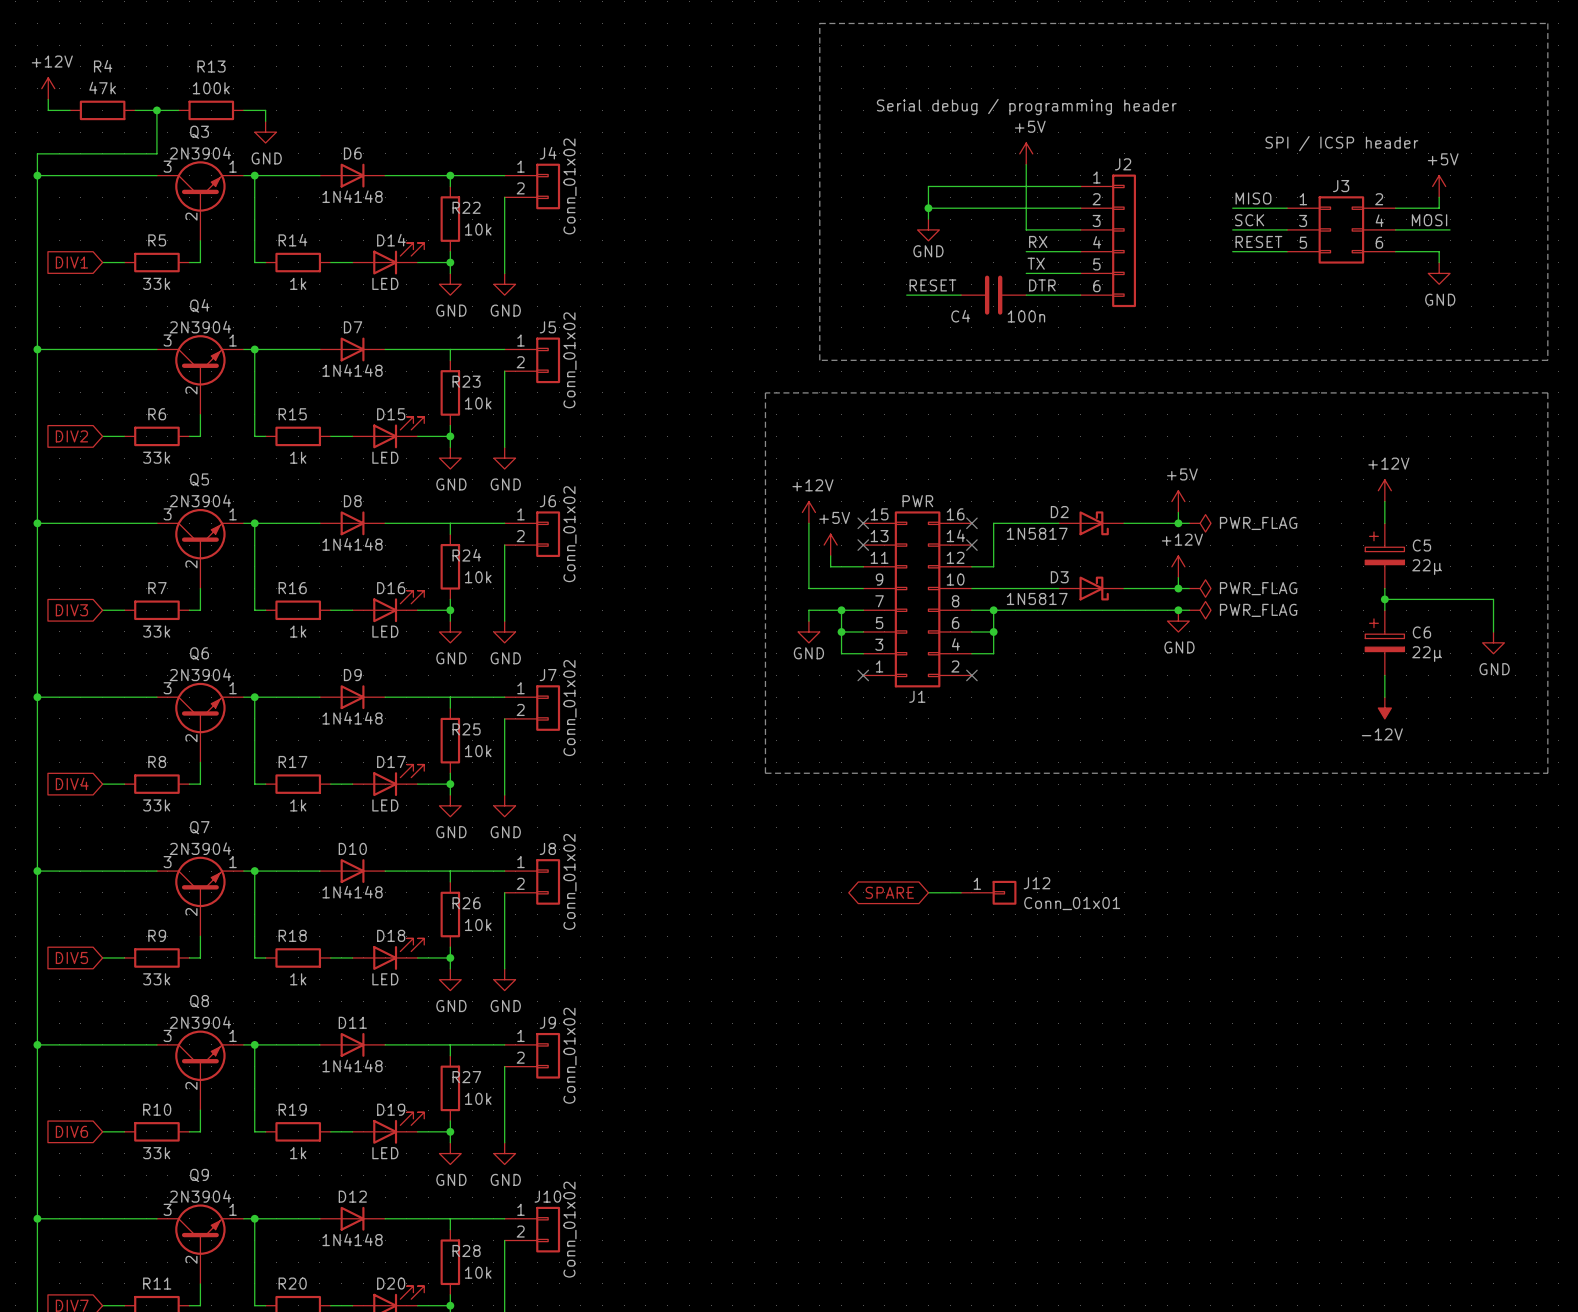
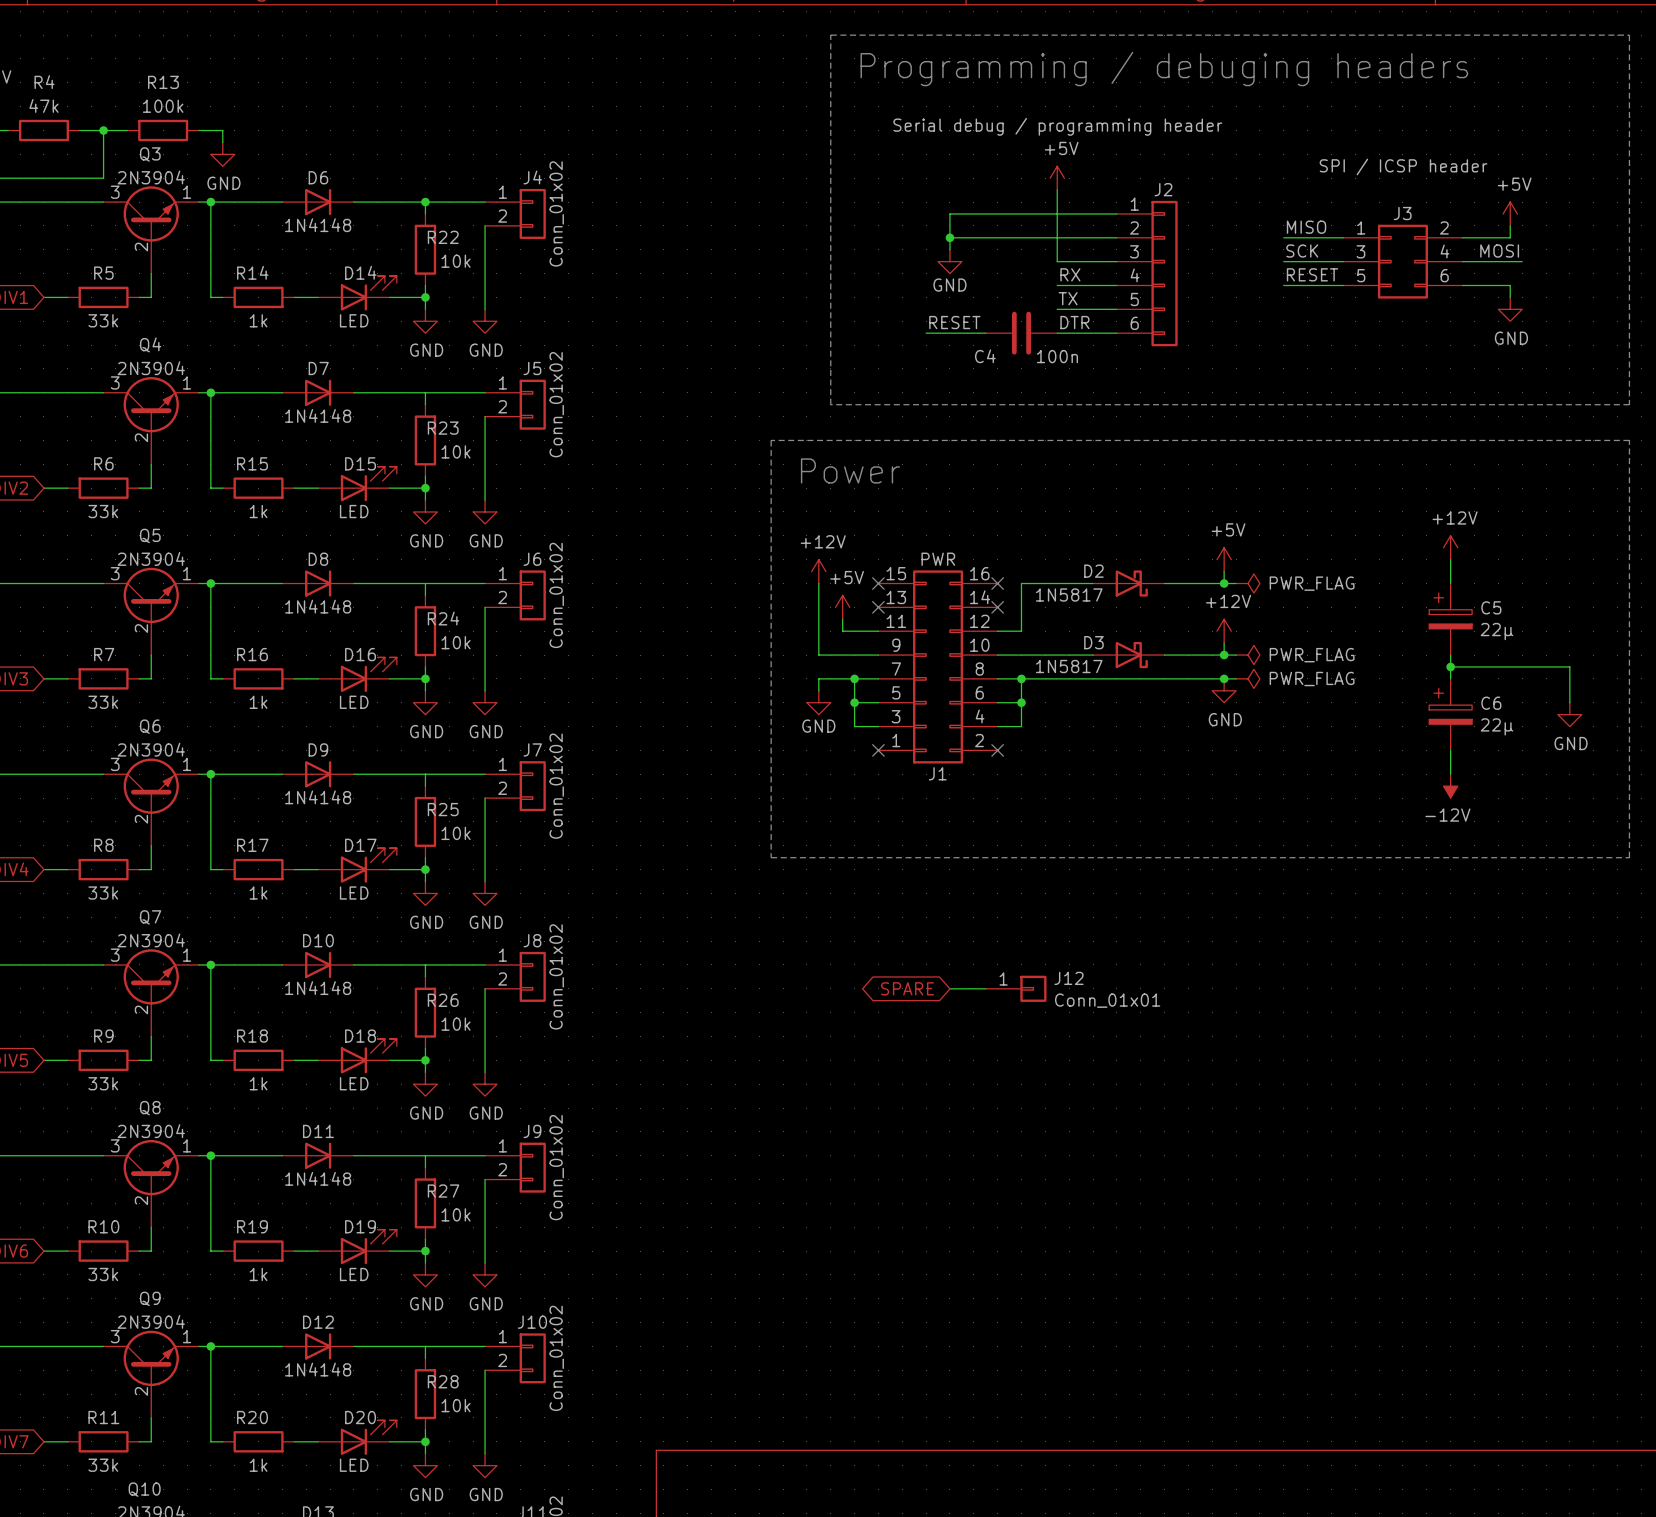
text: none -> Programming / debuging headers (1164, 69)
text: none -> Power (850, 470)

